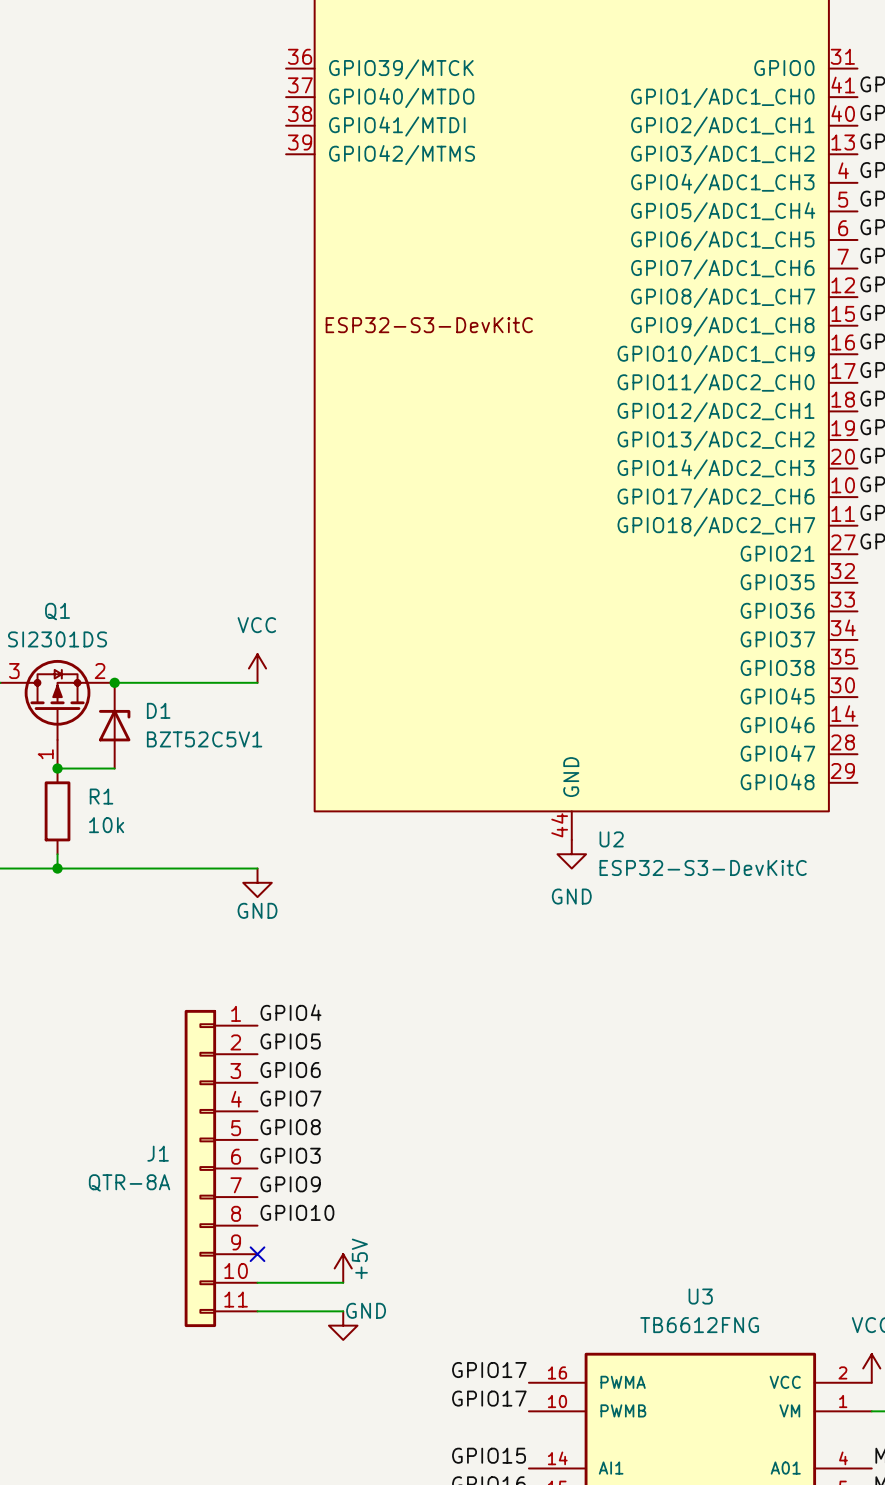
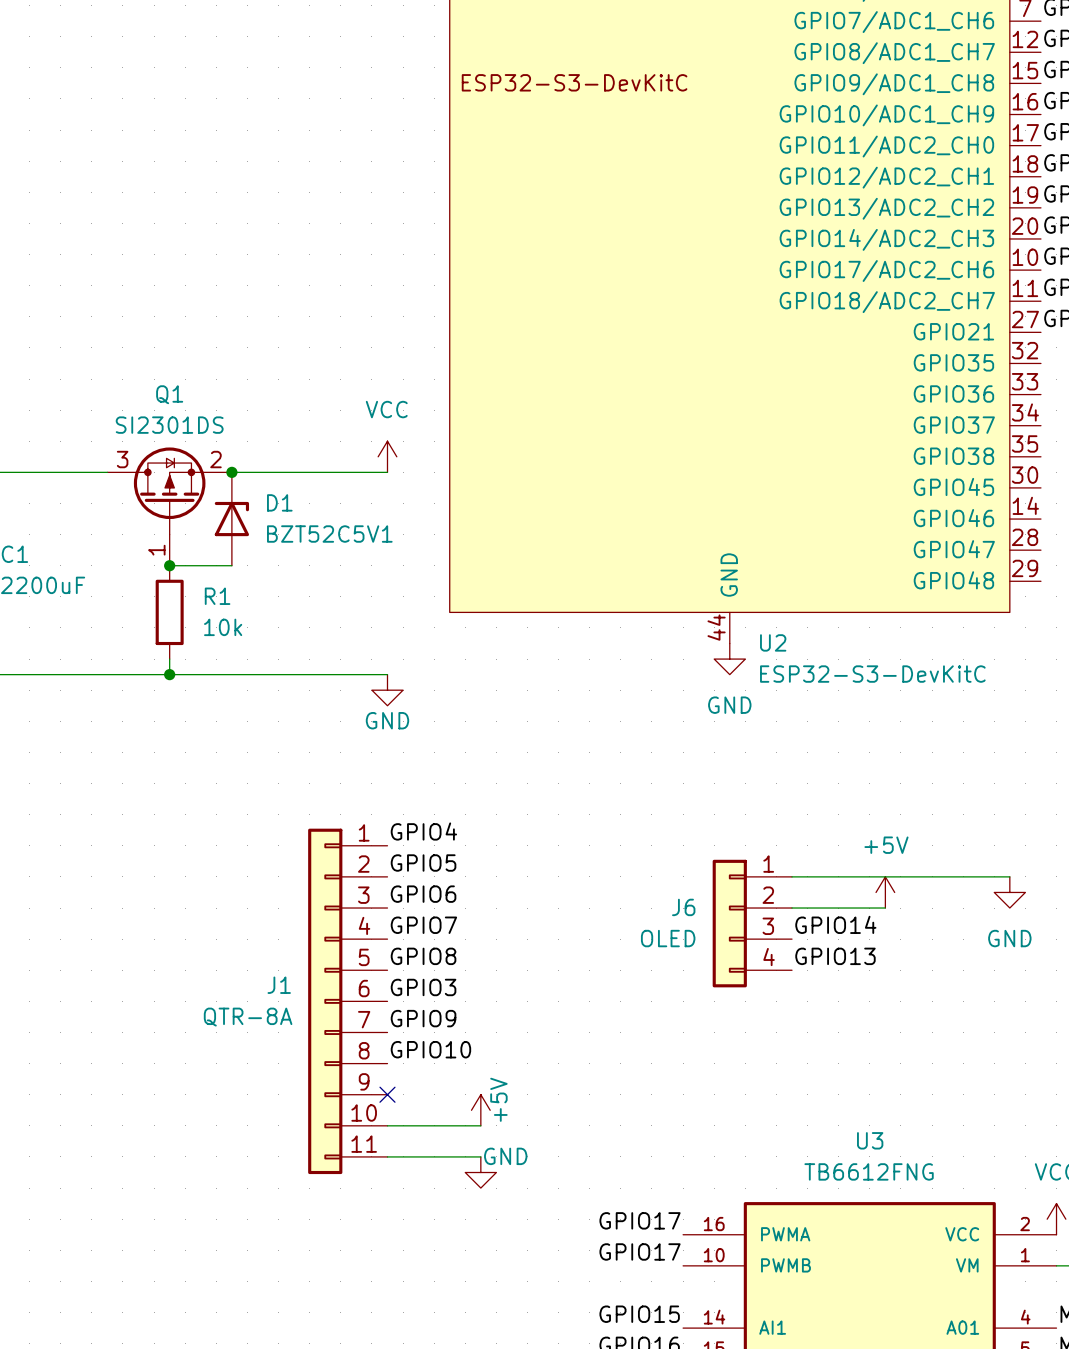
wire: none -> (792, 876) (1009, 876)
power symbol: none -> +5V (885, 892)
power symbol: none -> GND (1009, 892)
wire: none -> (792, 908) (885, 908)
J6: none -> OLED (752, 923)
label: none -> GPIO14 (835, 924)
label: none -> GPIO13 (835, 956)

